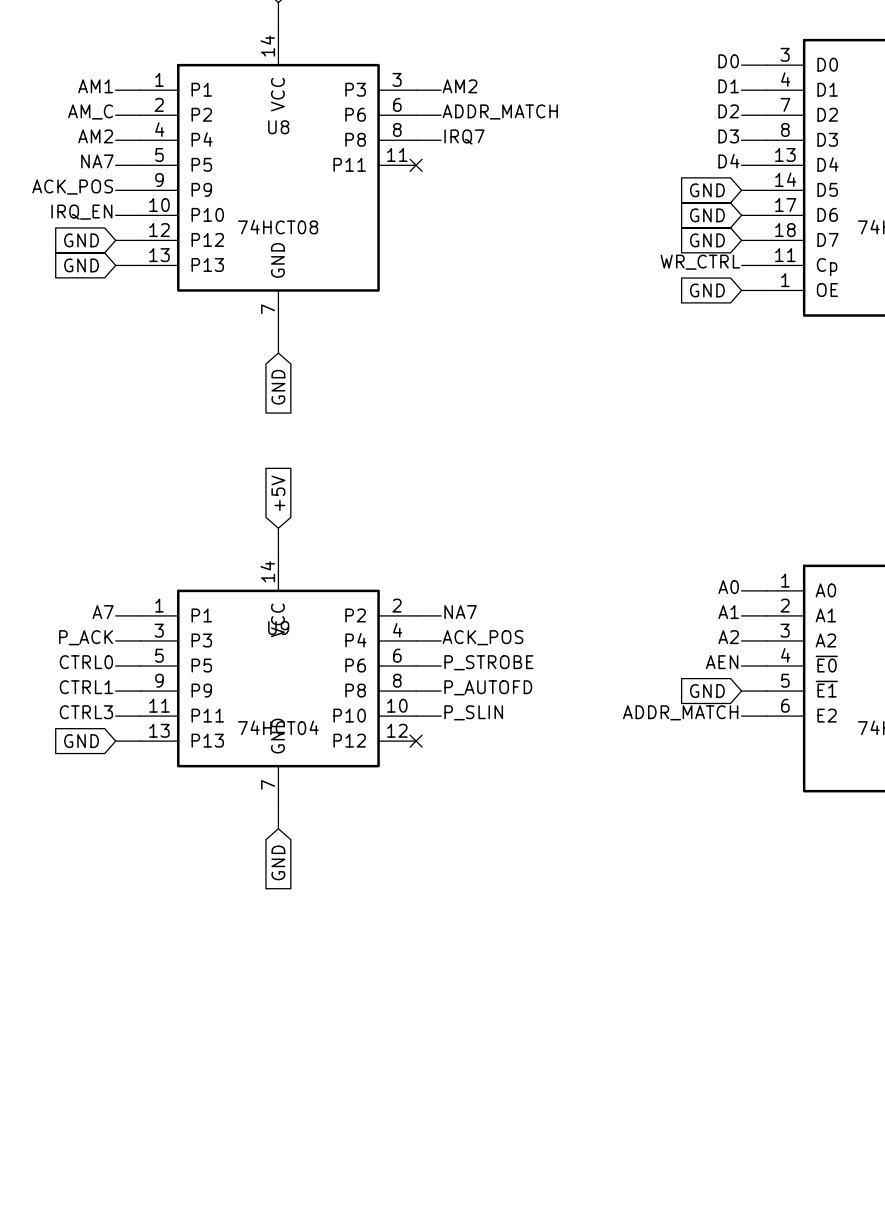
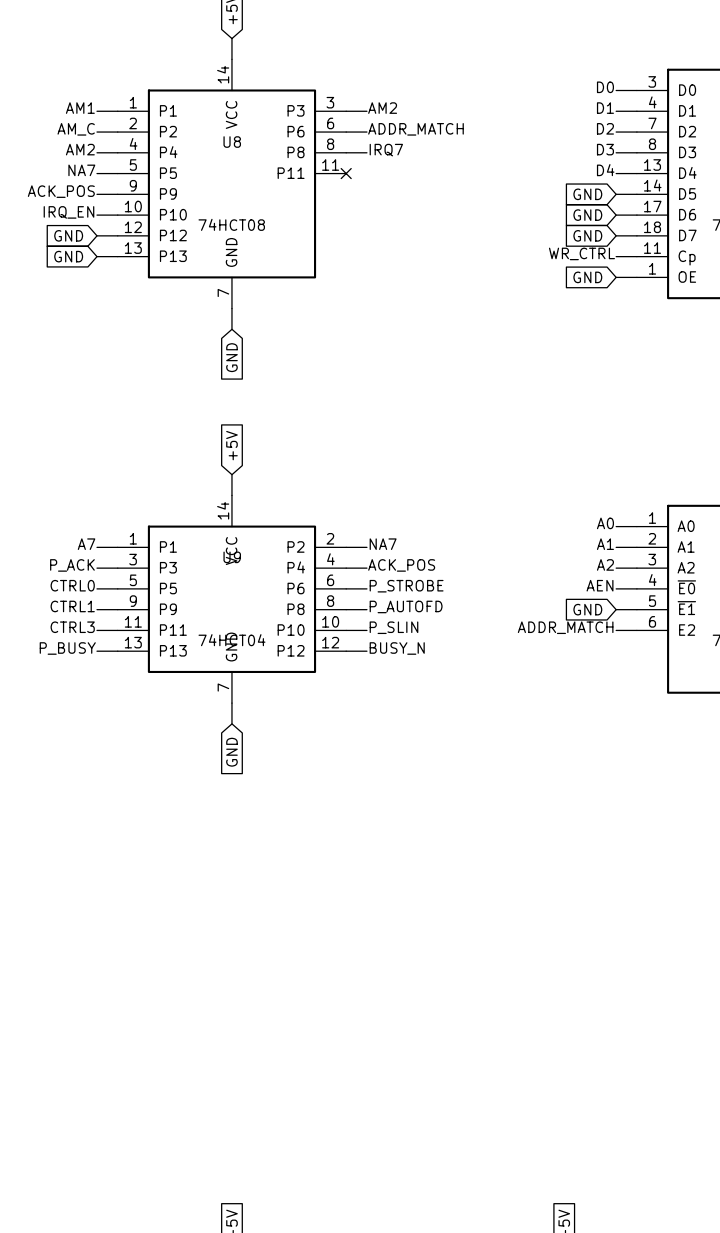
label: none -> P_BUSY (67, 648)
label: none -> BUSY_N (397, 648)
global label: GND (81, 741) -> none
wire: none -> (346, 651) (366, 651)
no-connect mark: (416, 741) -> none

